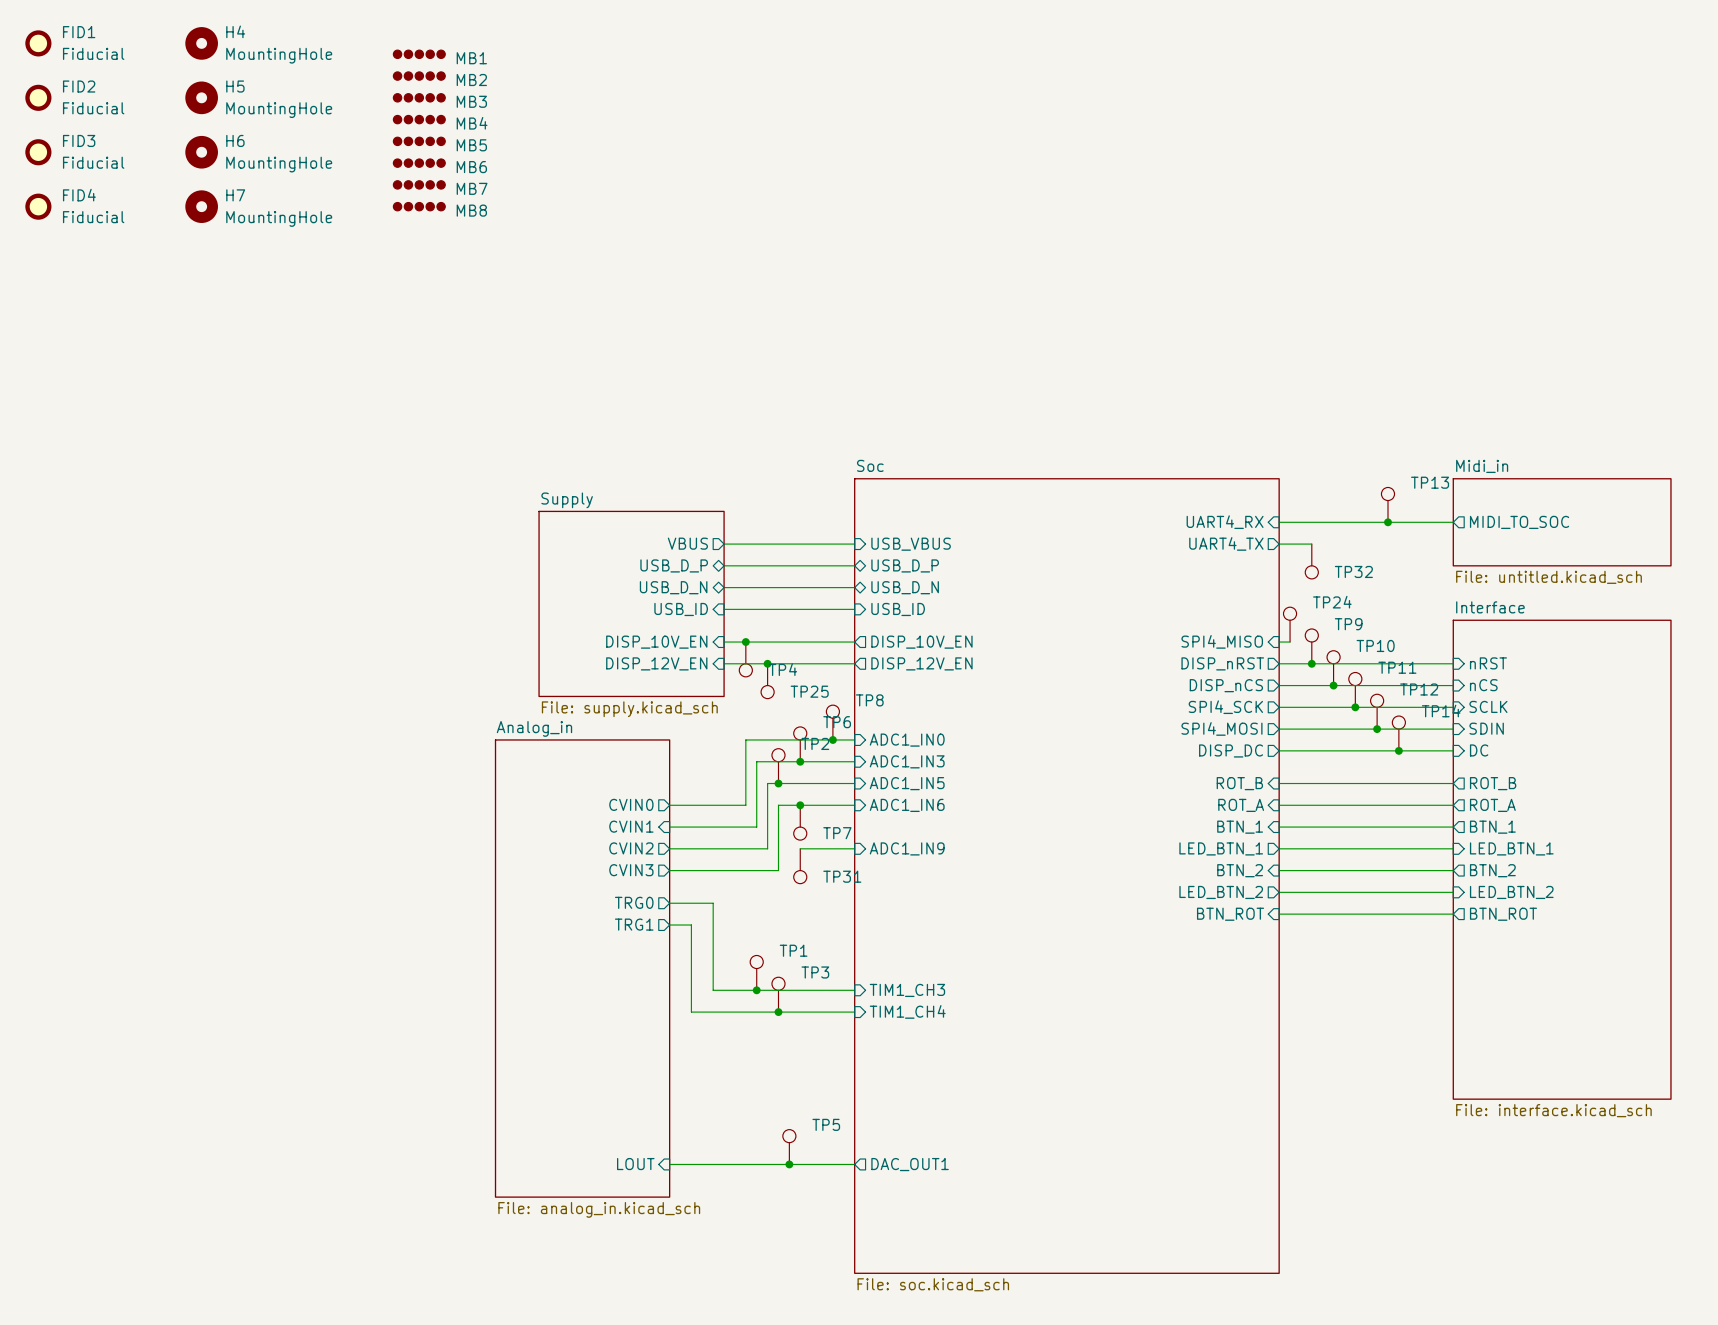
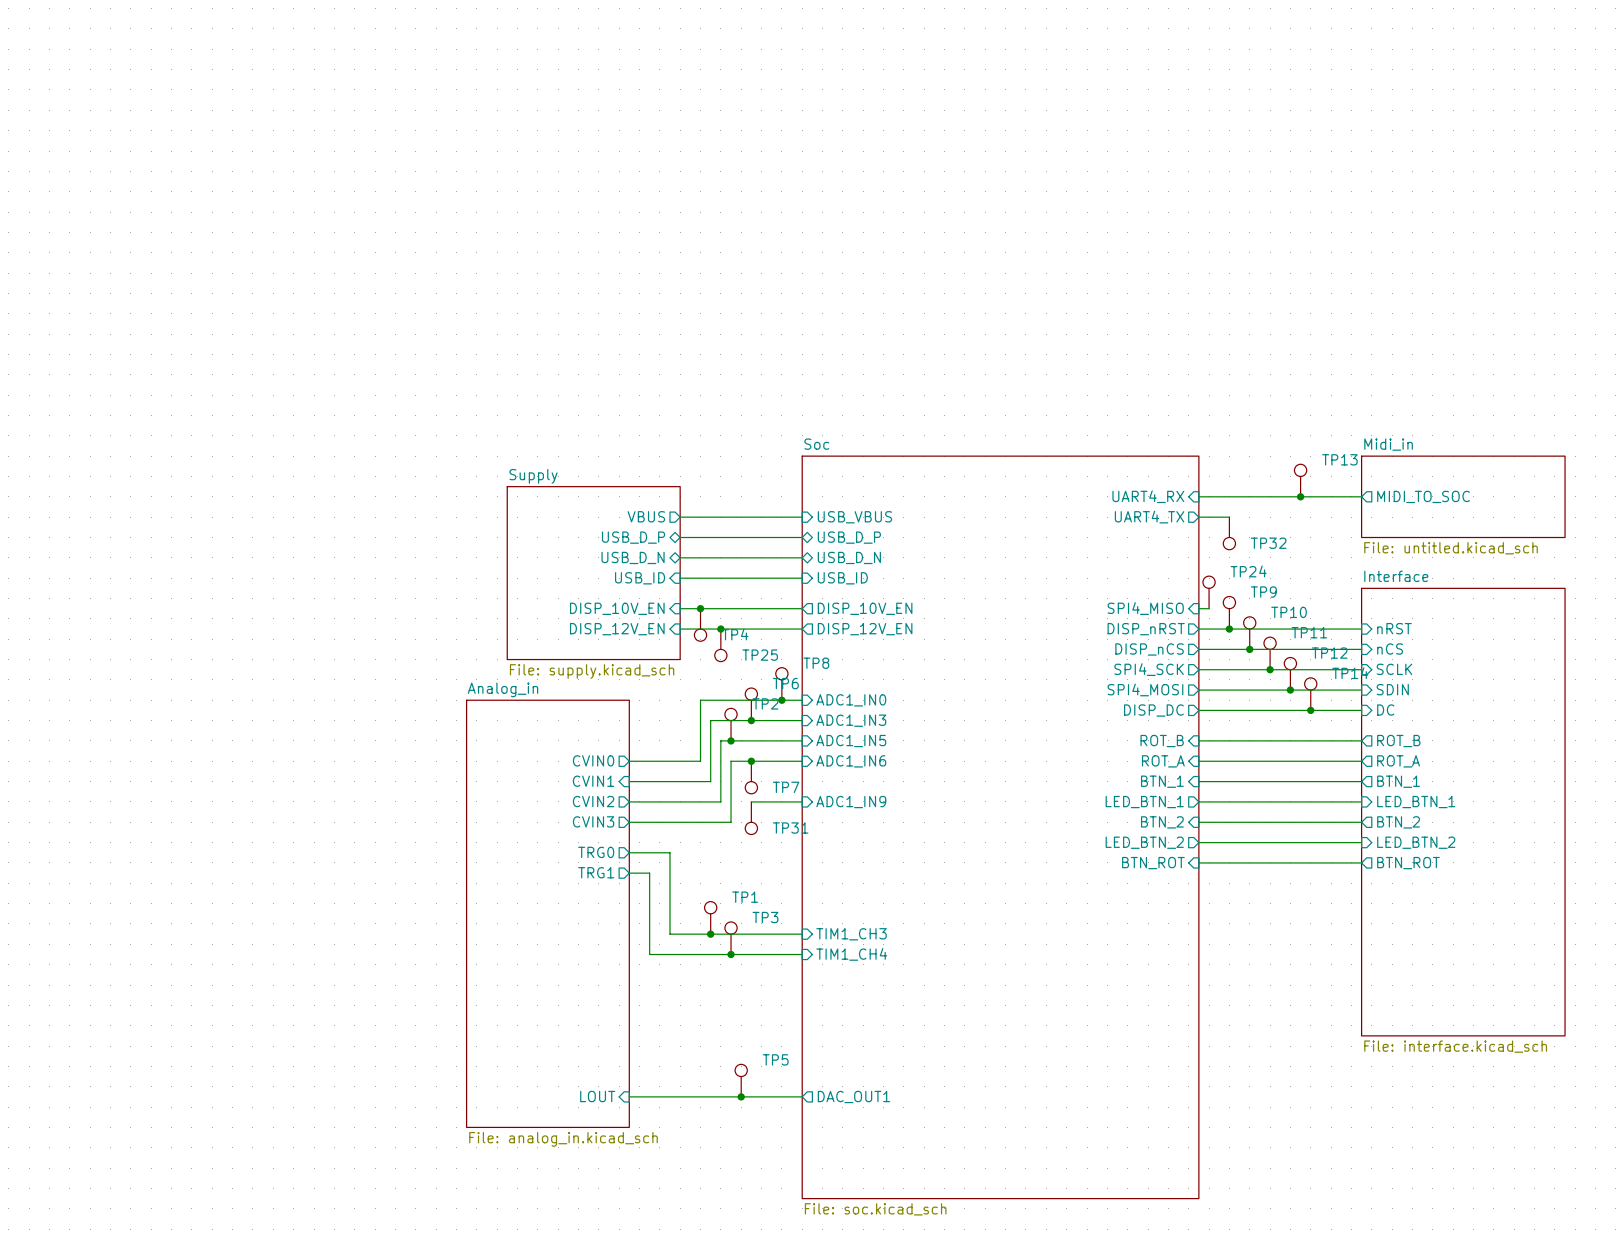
FID1: Fiducial (38, 43) -> none
H4: MountingHole (201, 43) -> none
MB1: (419, 54) -> none
MB2: (419, 76) -> none
FID2: Fiducial (38, 97) -> none
H5: MountingHole (201, 97) -> none
MB3: (419, 97) -> none
MB4: (419, 119) -> none
MB5: (419, 141) -> none
FID3: Fiducial (38, 152) -> none
H6: MountingHole (201, 152) -> none
MB6: (419, 163) -> none
MB7: (419, 184) -> none
FID4: Fiducial (38, 206) -> none
H7: MountingHole (201, 206) -> none
MB8: (419, 206) -> none

